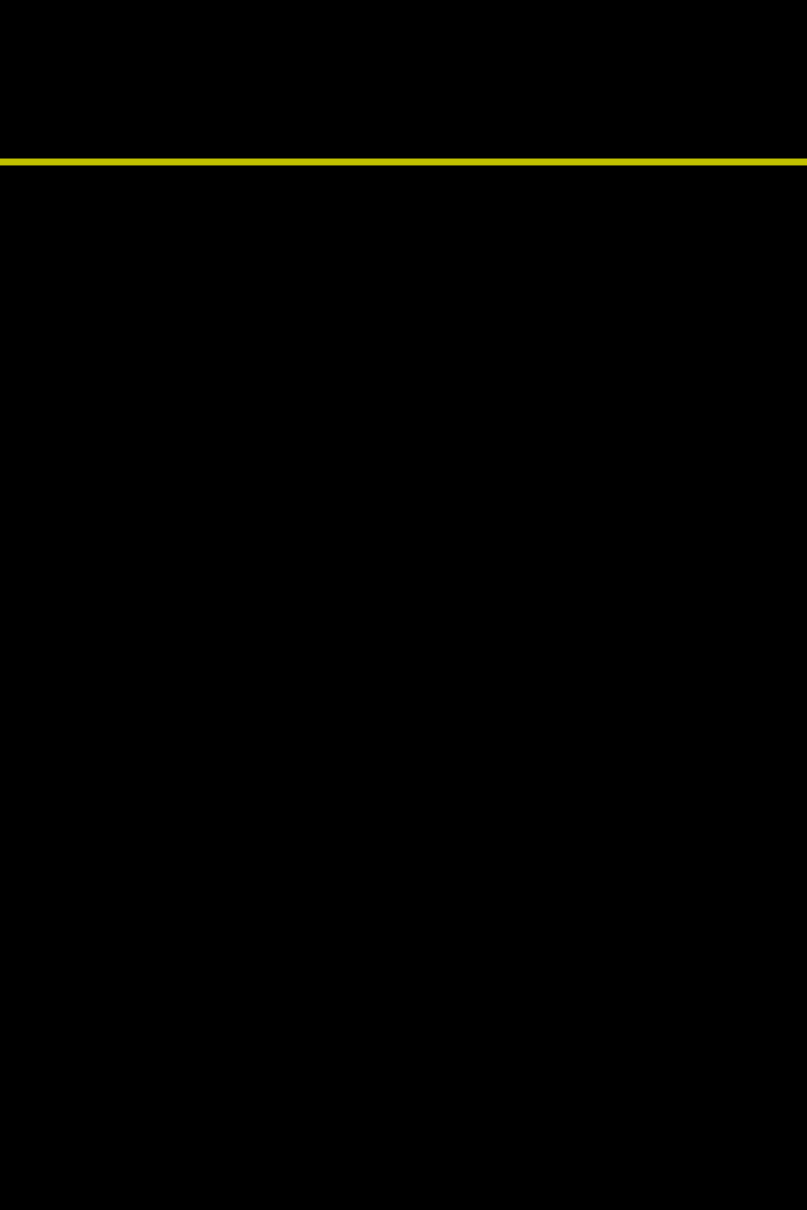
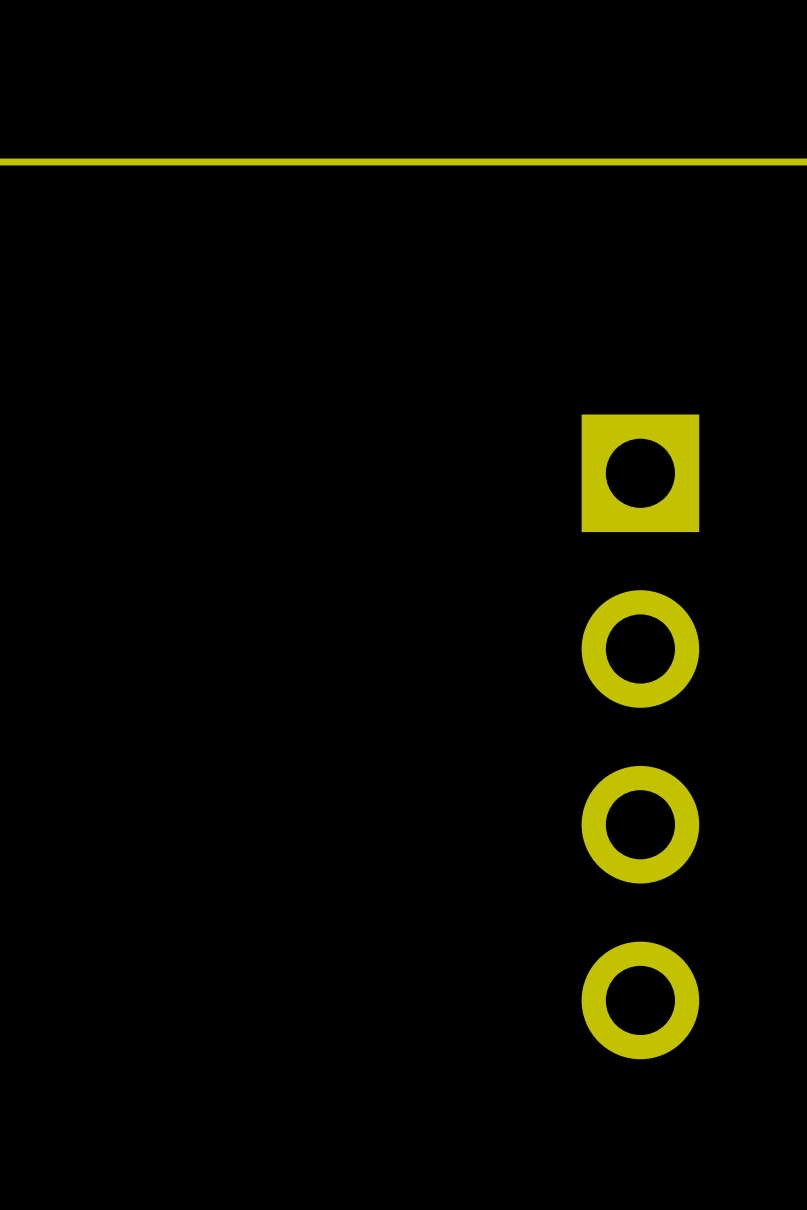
part: none -> (640, 736)

